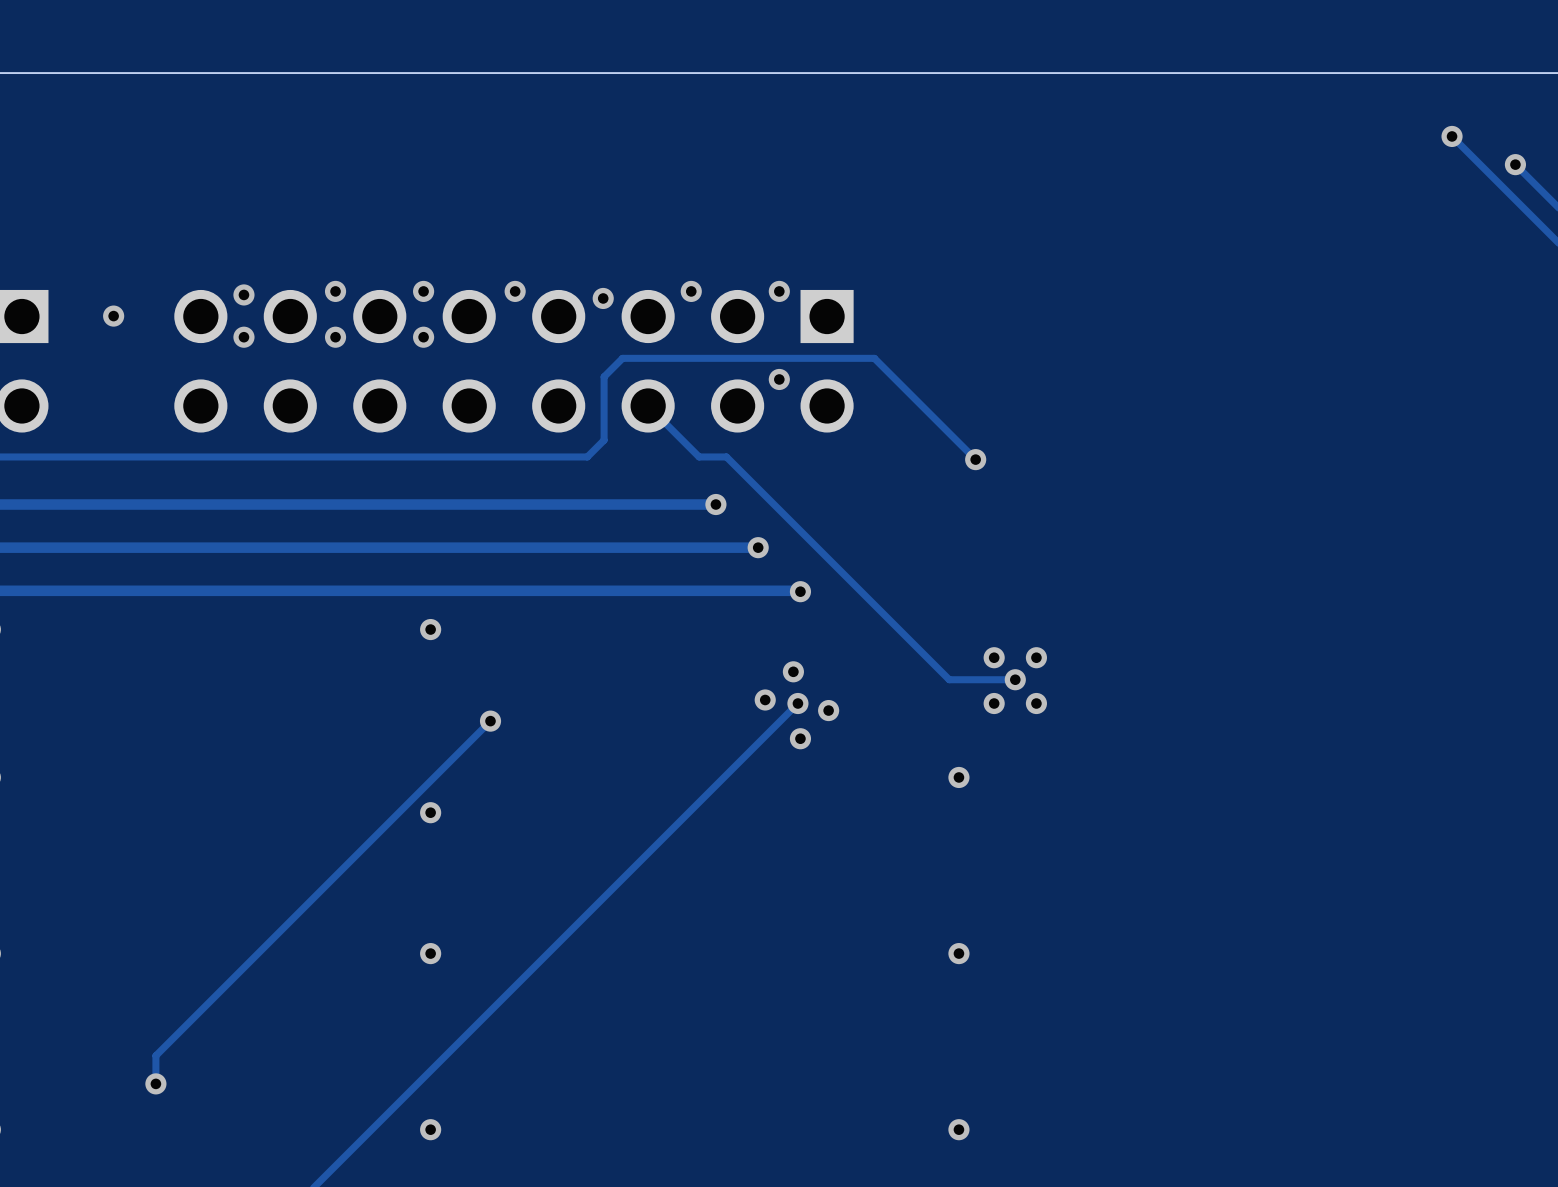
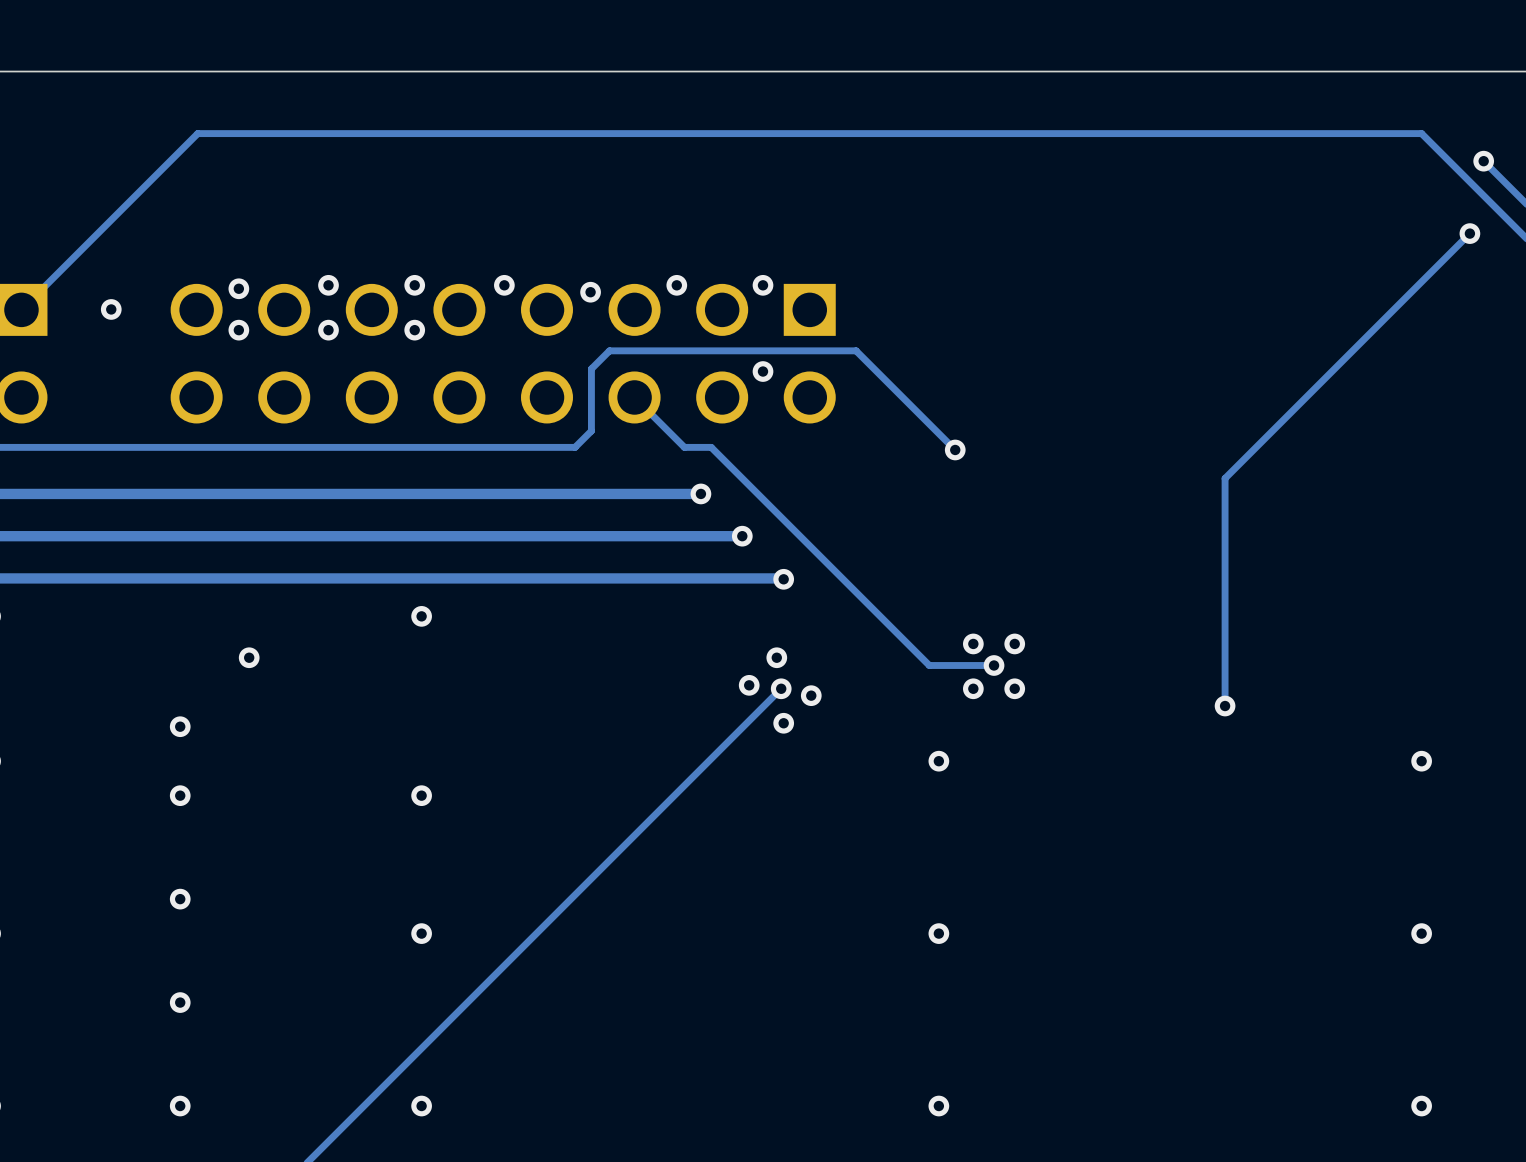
track: none -> (1421, 133) (197, 133) (21, 309)
via position: (1452, 136) -> (1469, 233)
track: none -> (1469, 233) (1225, 478) (1225, 706)
via: none -> (249, 657)
track: (490, 721) (155, 1055) (155, 1083) -> none
via: (490, 721) -> none
via: none -> (1225, 706)
via: none -> (180, 726)
via: none -> (1421, 761)
via: none -> (180, 795)
via: none -> (180, 899)
via: none -> (1421, 933)
via: none -> (180, 1002)
via: (155, 1083) -> none
via: none -> (180, 1106)
via: none -> (1421, 1106)

